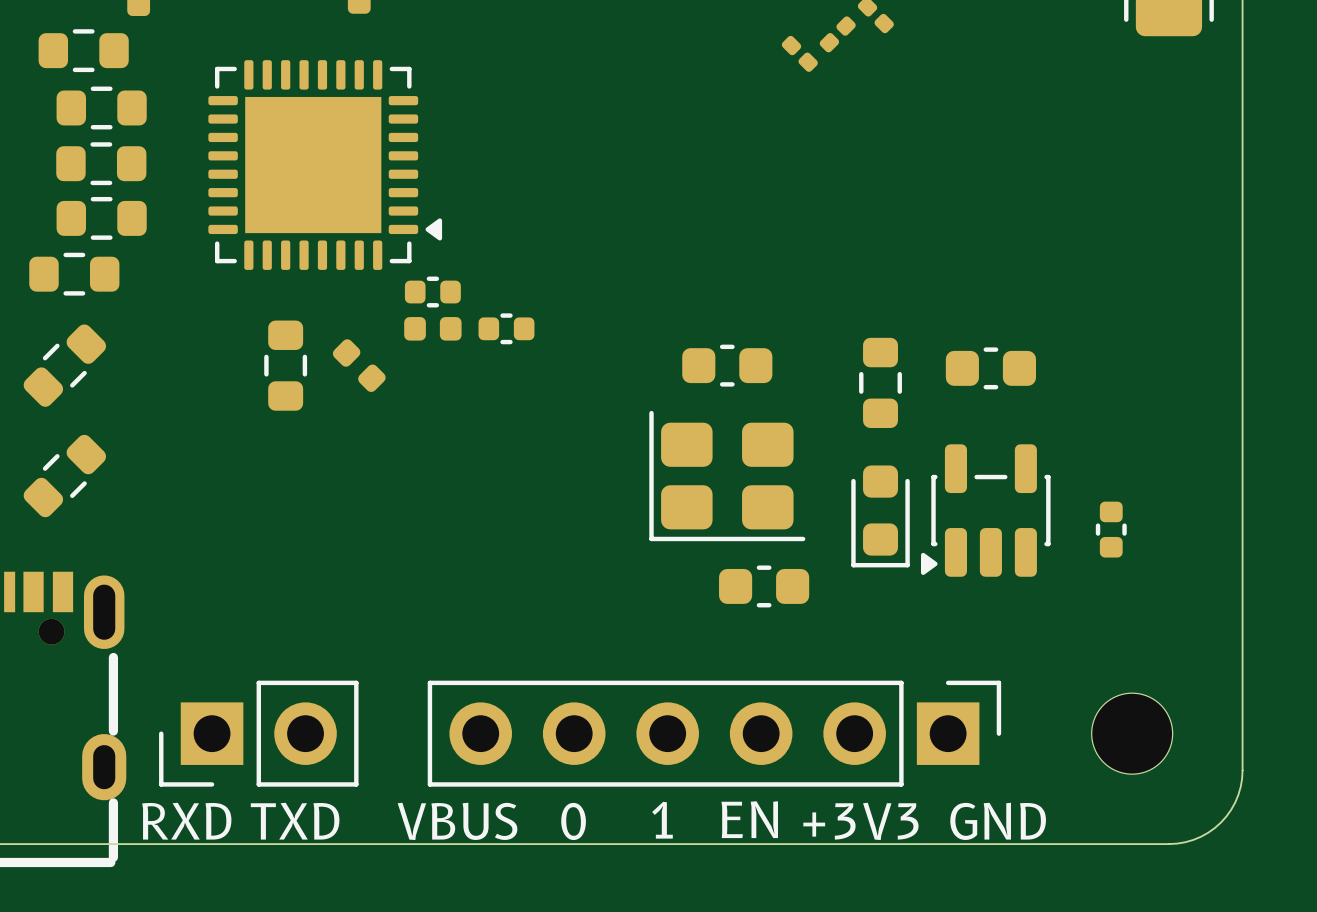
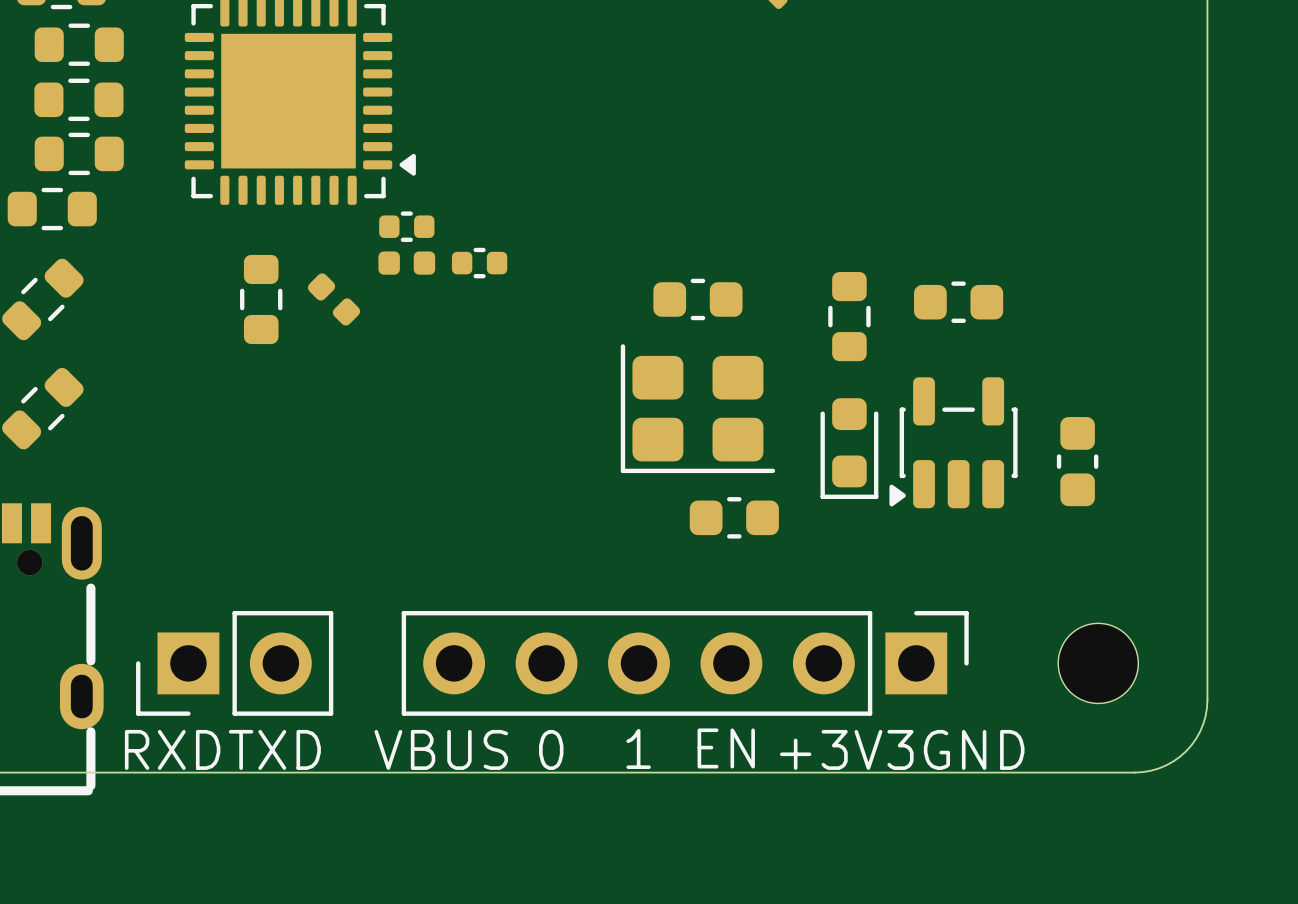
part footprint: [1095, 501, 1127, 558] -> [1056, 417, 1099, 507]

